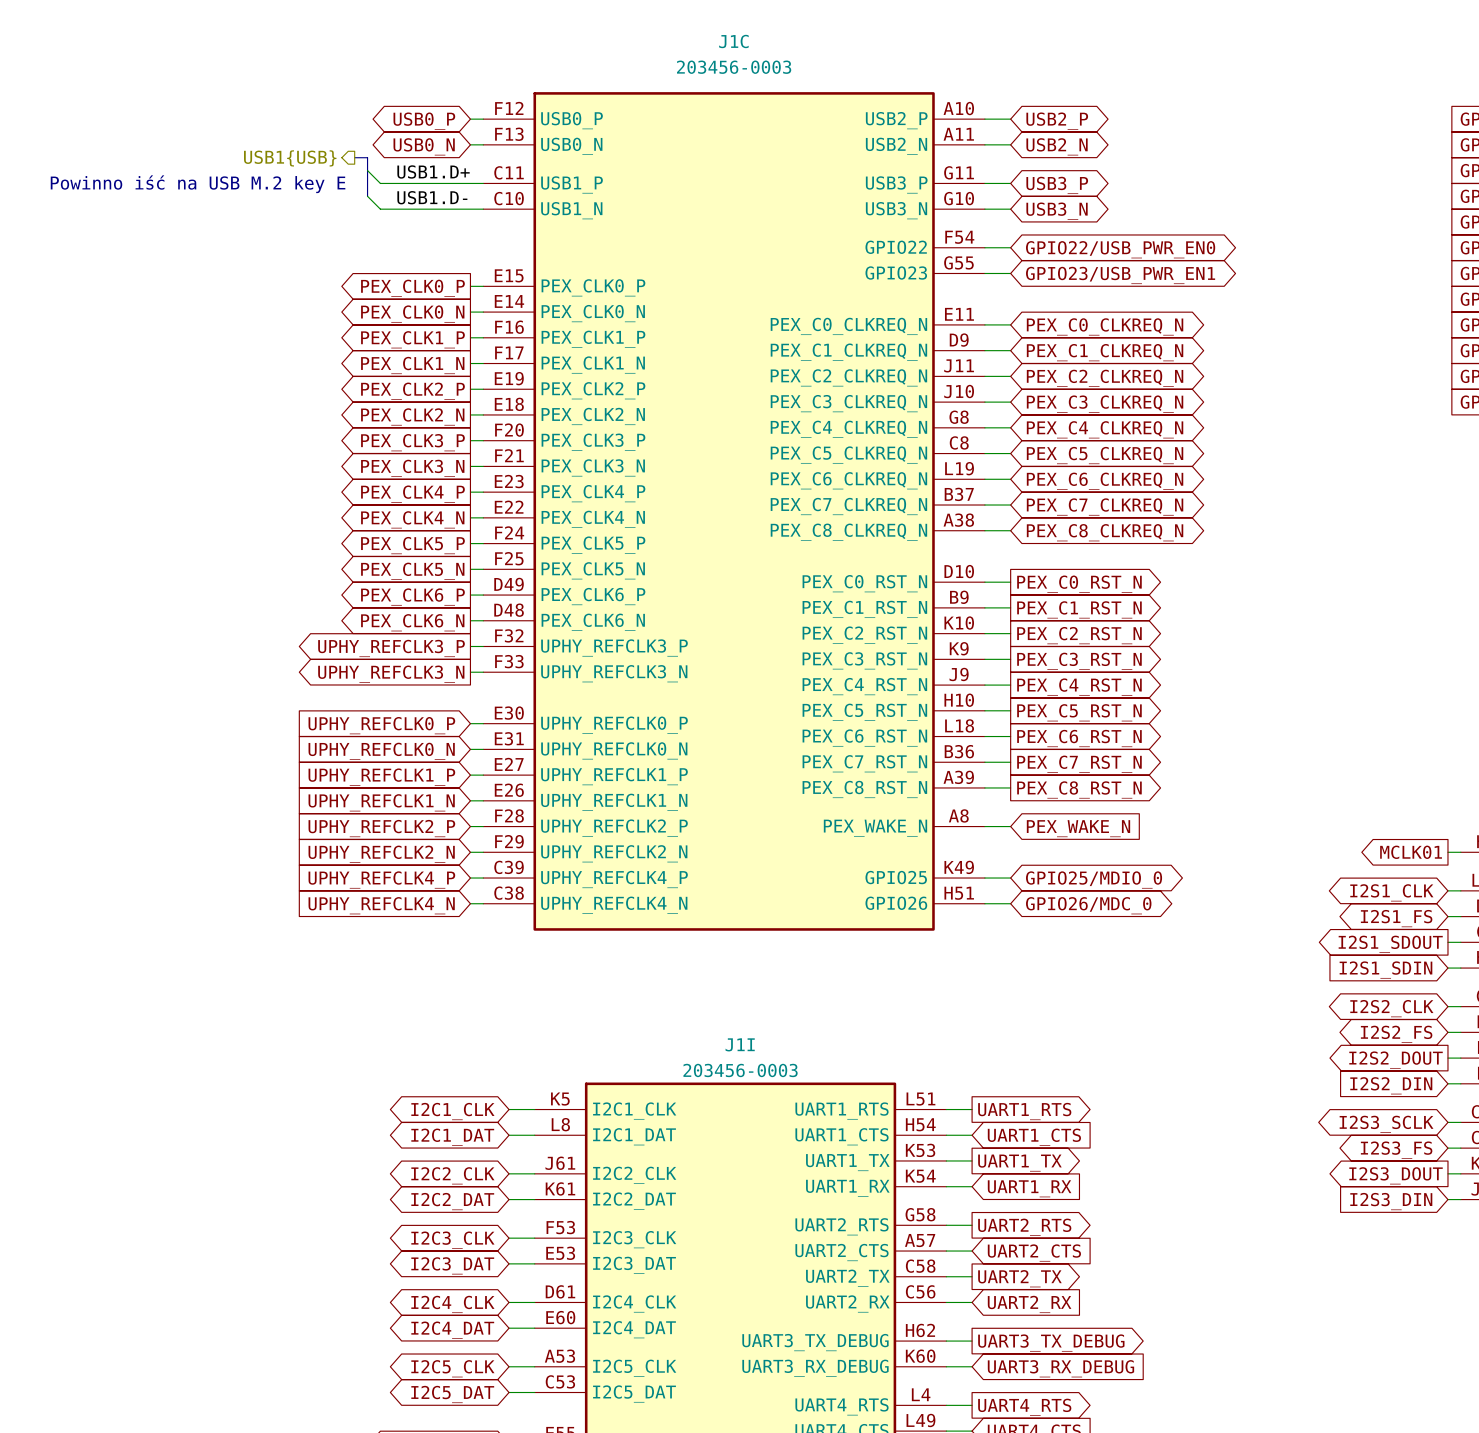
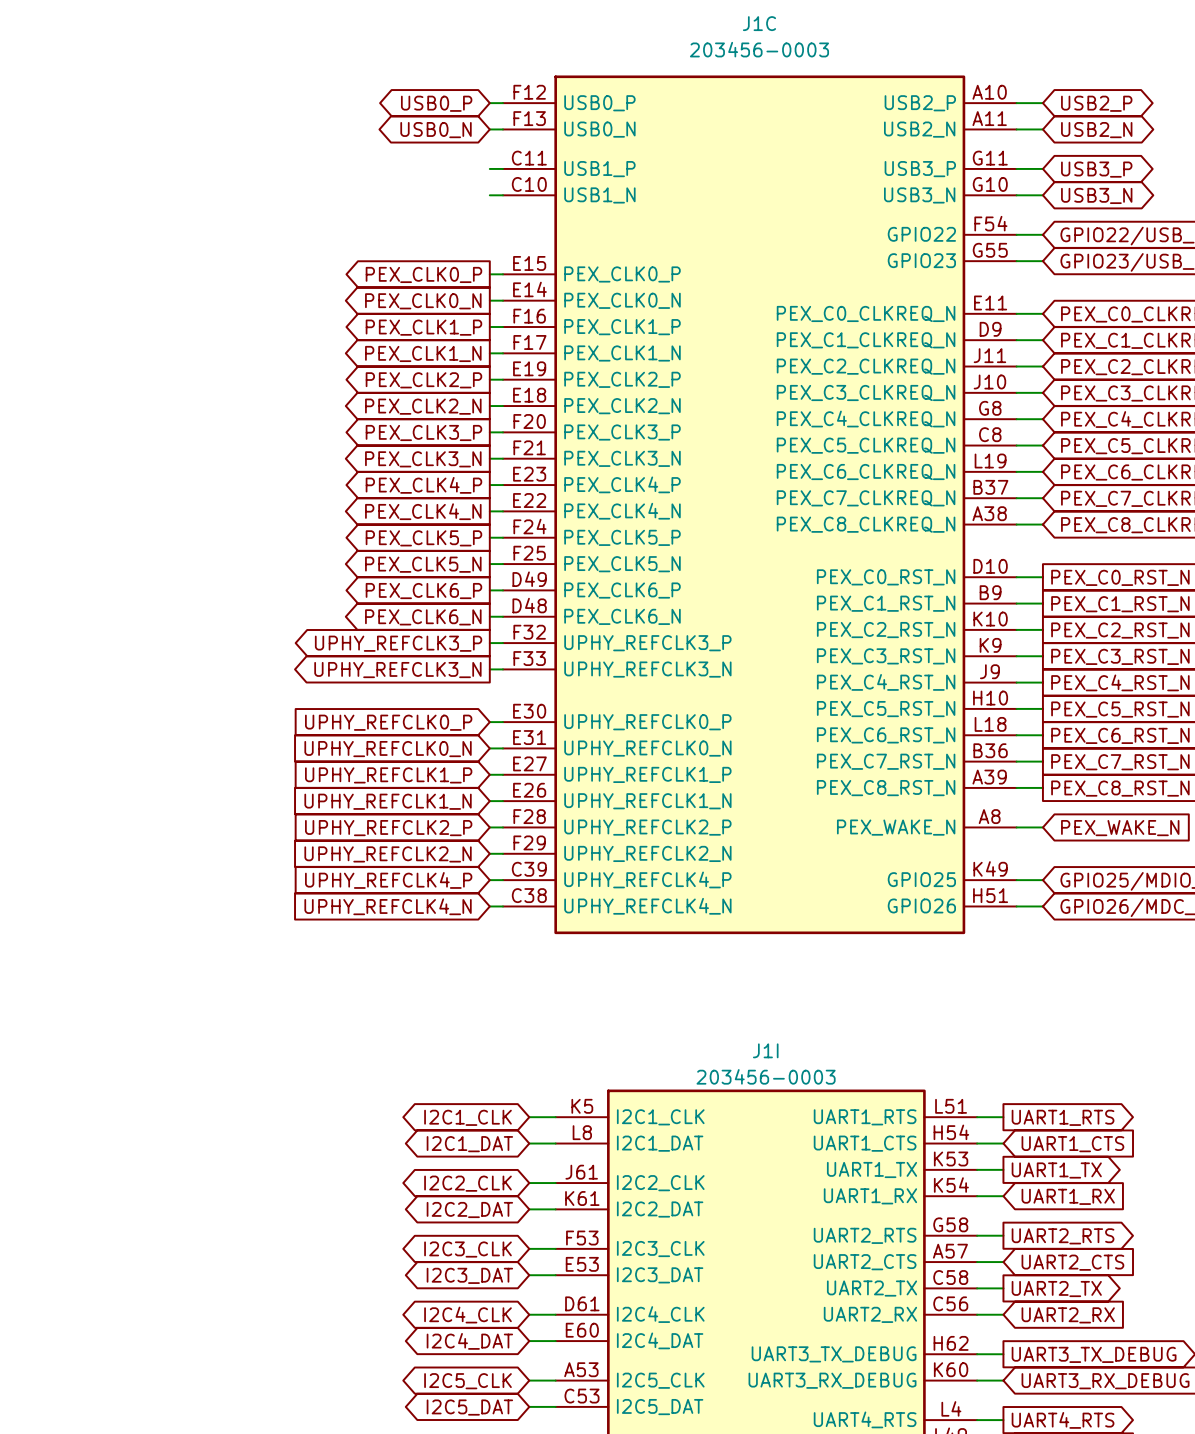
bus: (354, 157) (367, 157) (367, 196) -> none
hierarchical label: USB1{USB} (290, 158) -> none
wire: (367, 170) (380, 183) (470, 183) -> none
label: USB1.D+ (433, 171) -> none
text: Powinno iść na USB M.2 key E (198, 184) -> none
wire: (367, 196) (380, 209) (470, 209) -> none
label: USB1.D- (432, 197) -> none

